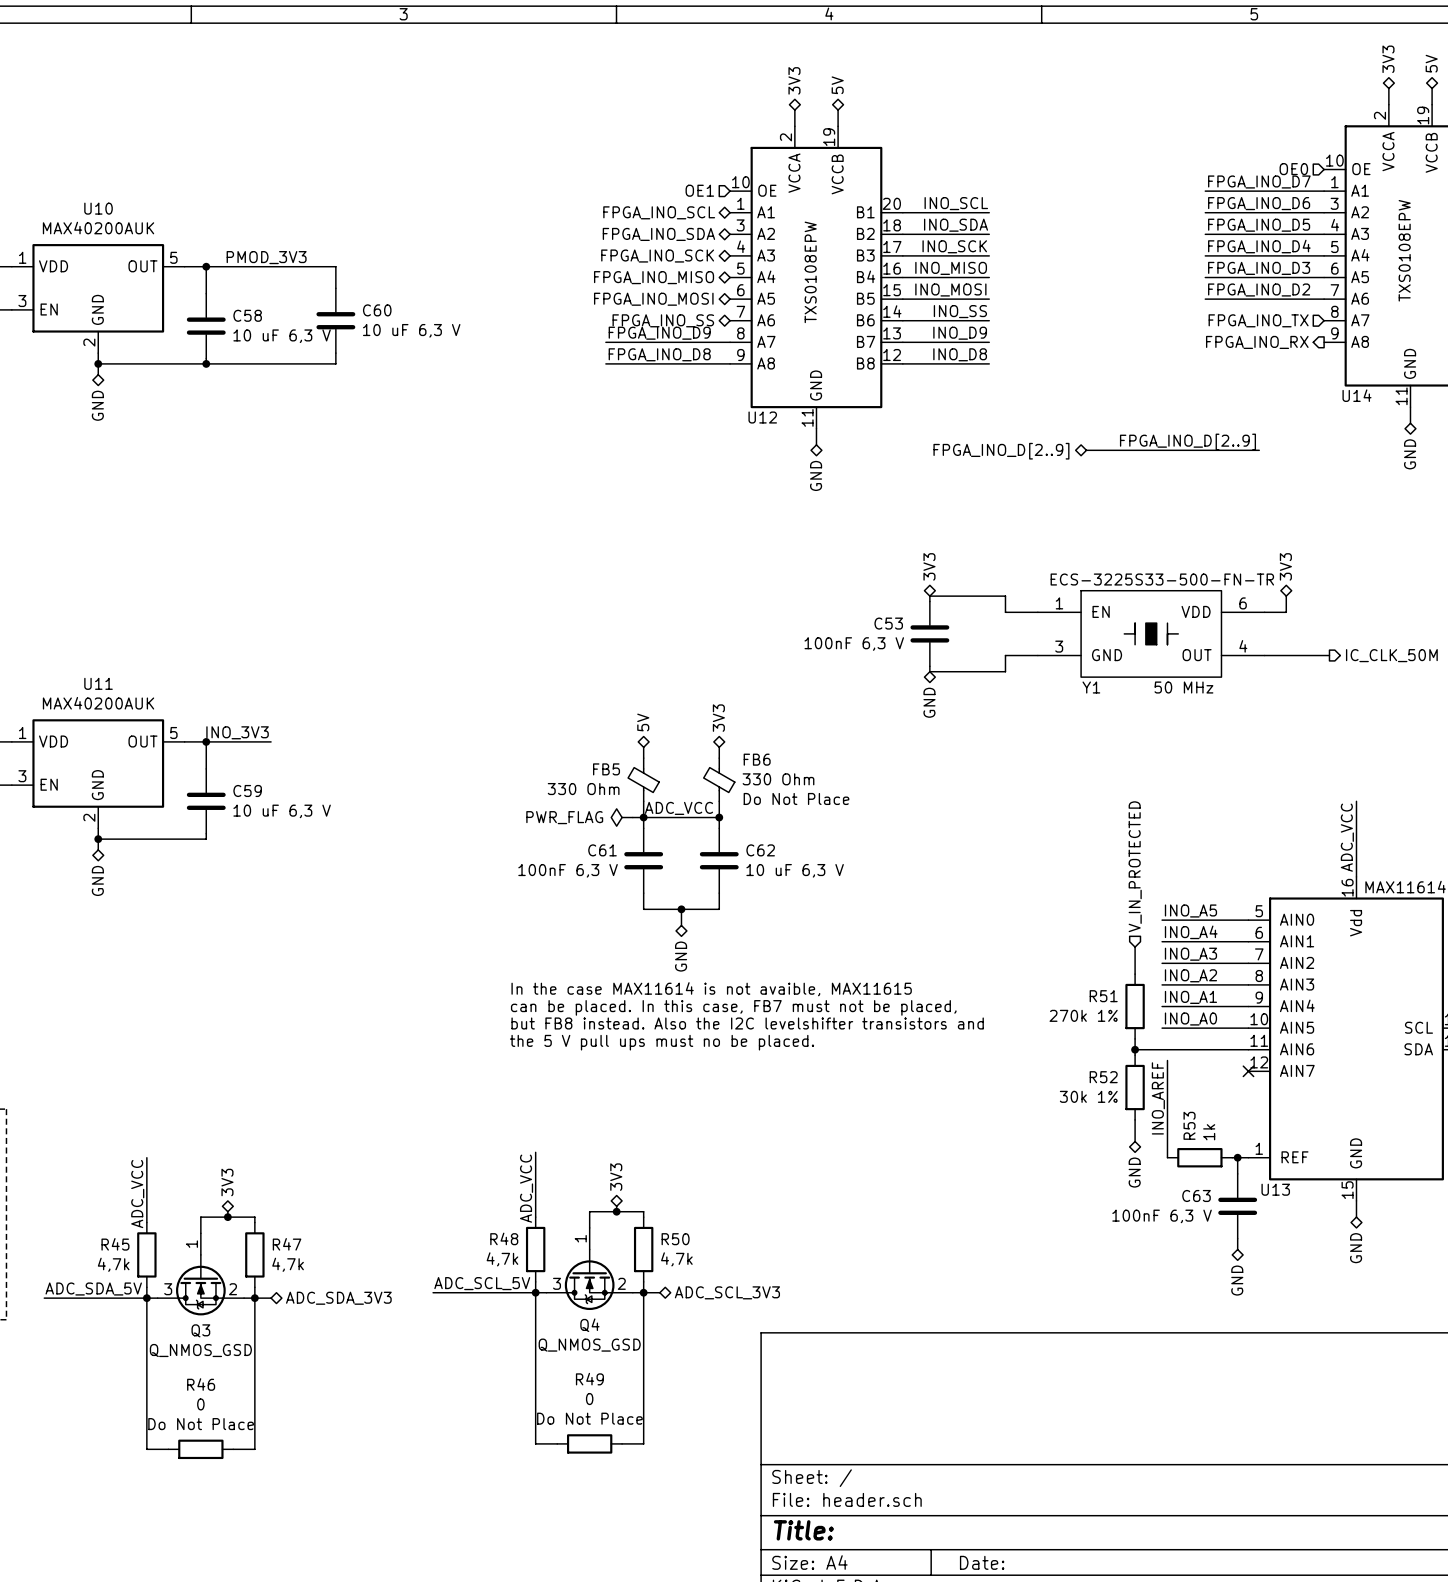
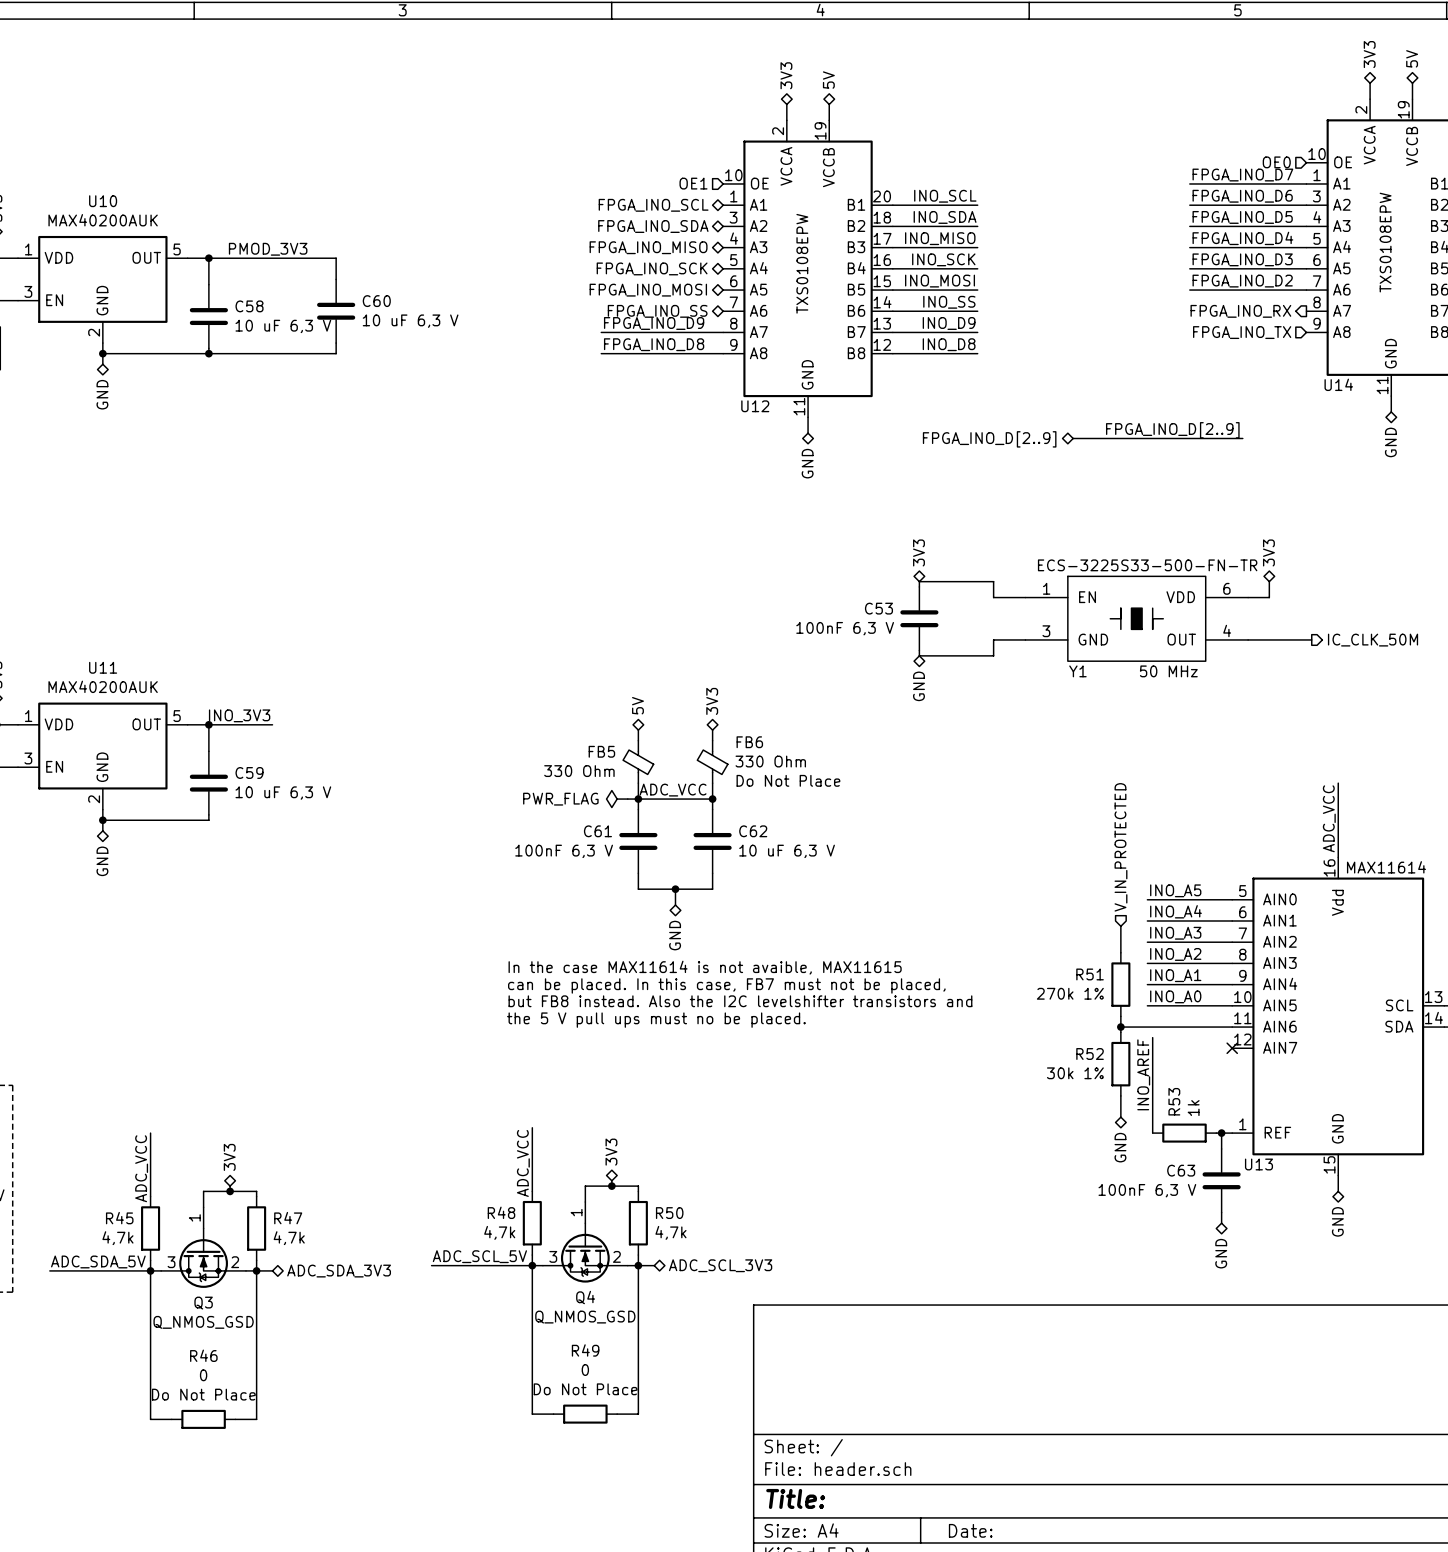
label: INO_SCK (954, 246) -> INO_MISO (940, 238)
hierarchical label: FPGA_INO_SCK (657, 256) -> FPGA_INO_MISO (648, 247)
label: INO_MISO (951, 268) -> INO_SCK (943, 259)
hierarchical label: FPGA_INO_MISO (654, 277) -> FPGA_INO_SCK (652, 268)
hierarchical label shape: input (1258, 320) -> output (1240, 311)
hierarchical label: FPGA_INO_TX (1258, 320) -> FPGA_INO_RX (1240, 311)
hierarchical label shape: output (1257, 342) -> input (1242, 332)
hierarchical label: FPGA_INO_RX (1257, 342) -> FPGA_INO_TX (1242, 332)

